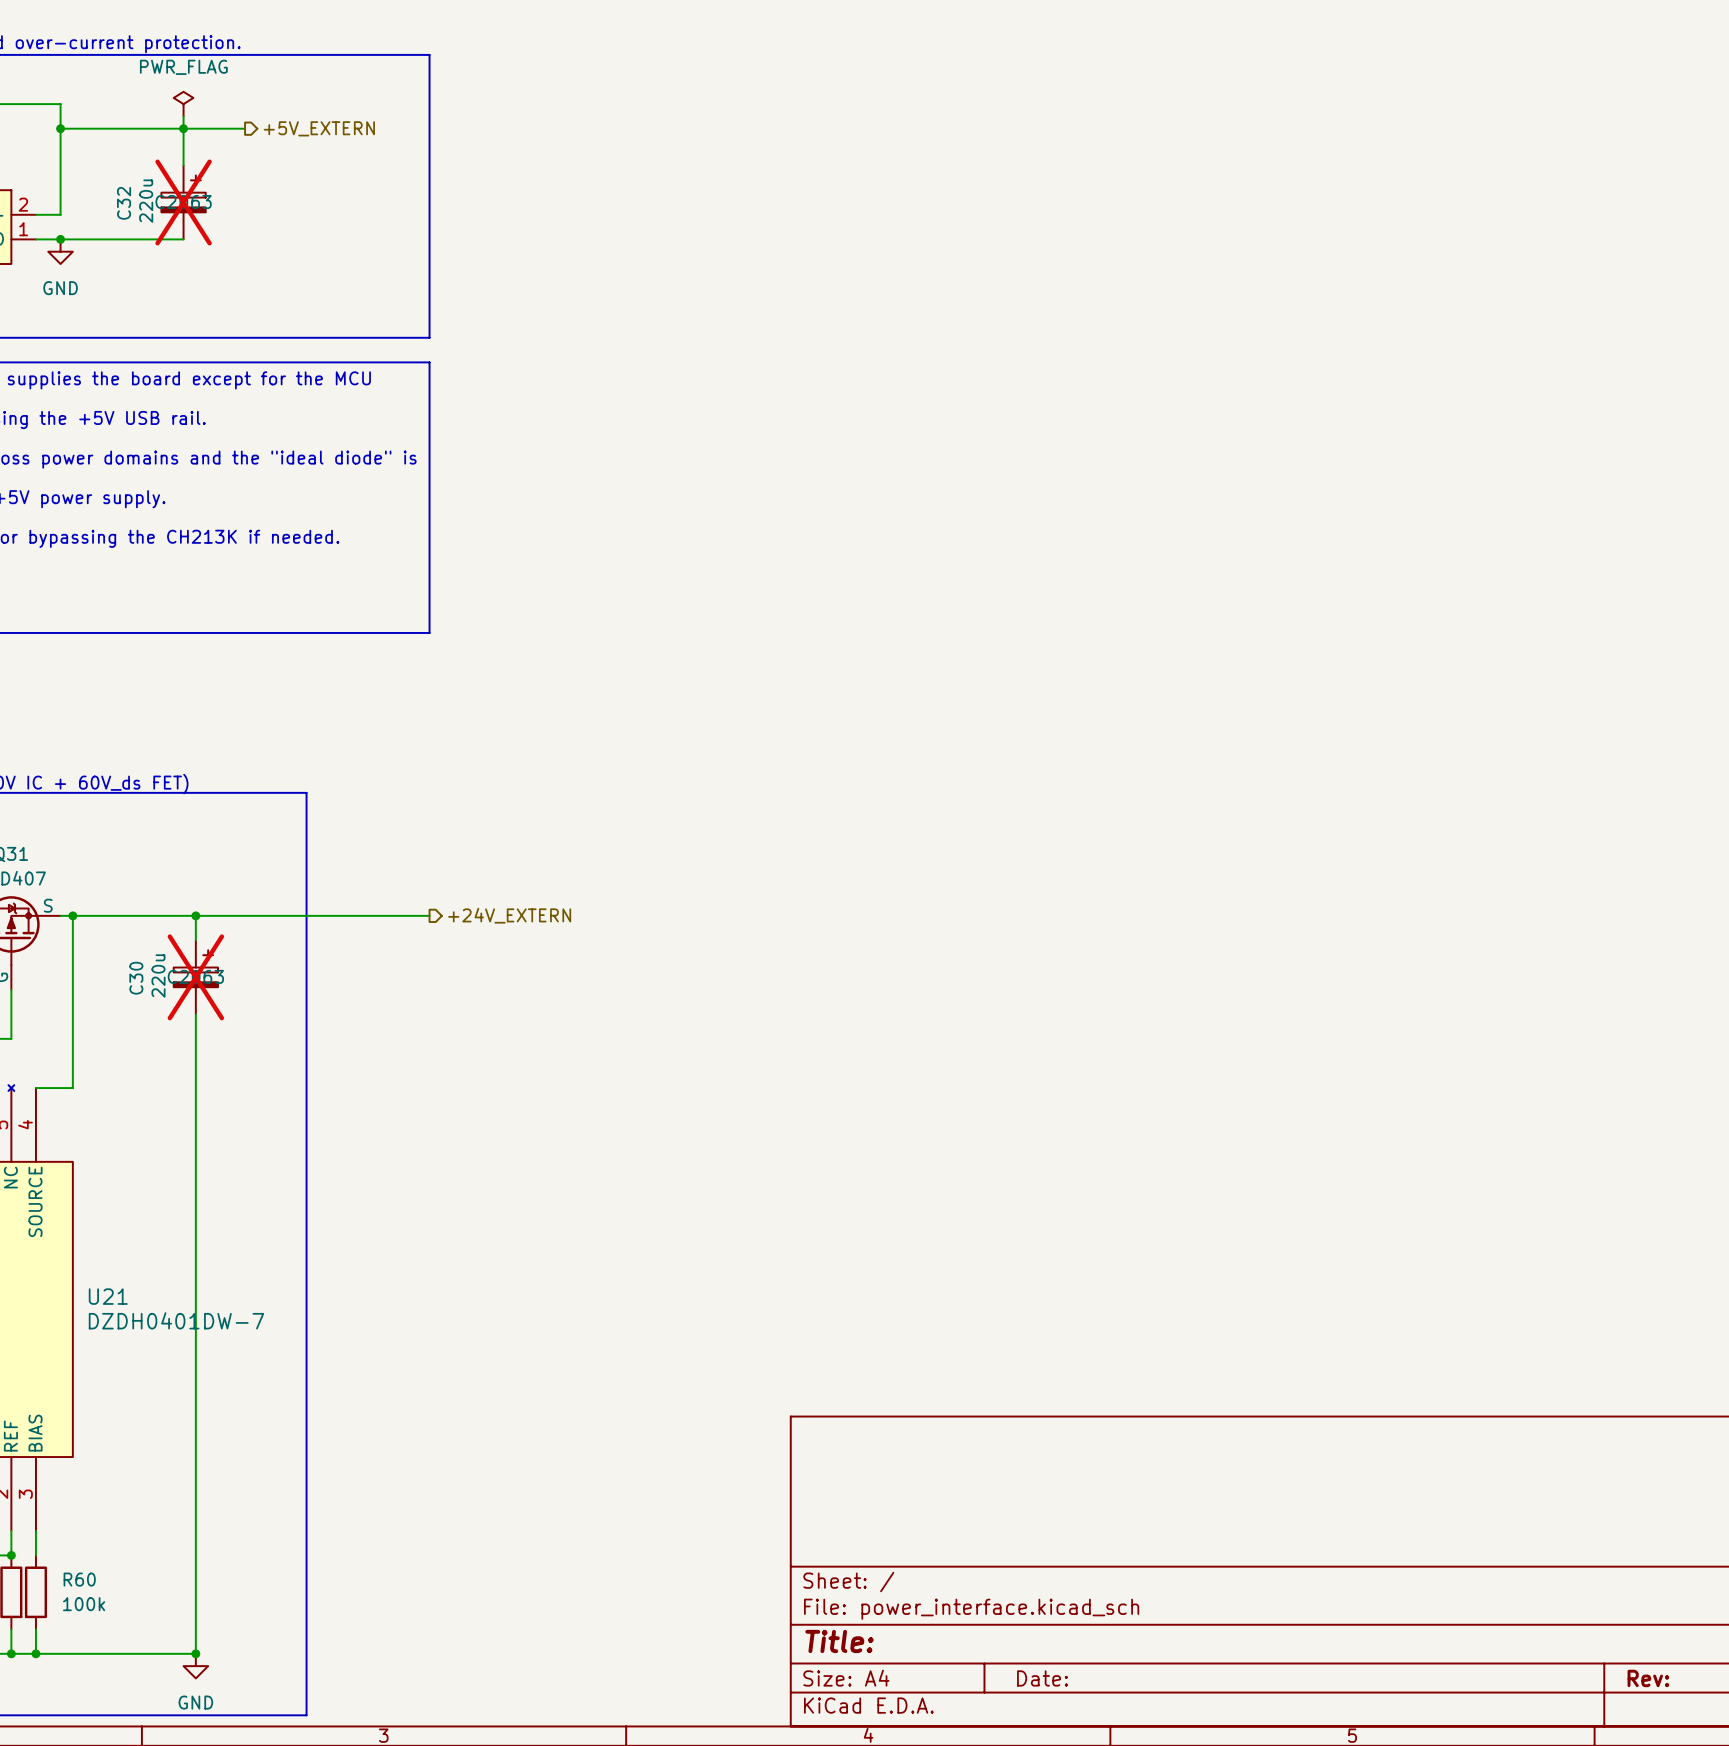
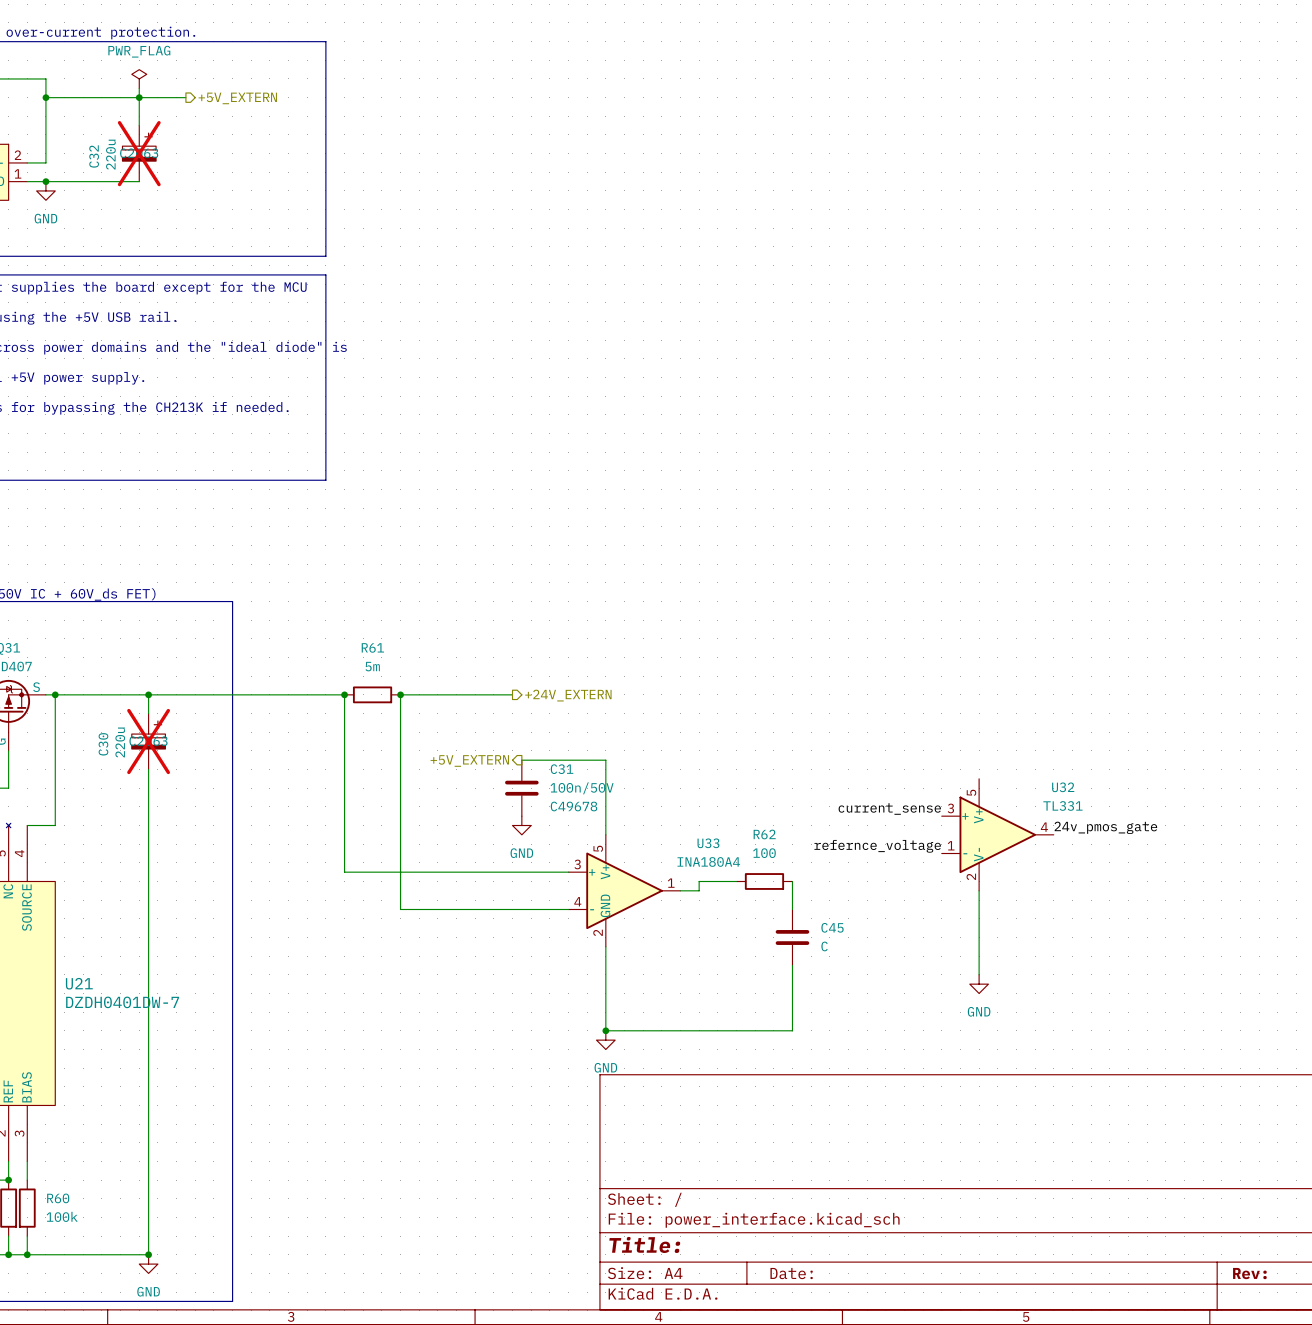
wire: none -> (325, 694) (344, 694) (344, 872) (568, 872)
junction: none -> (344, 694)
R61: none -> 5m (372, 694)
hierarchical label: +24V_EXTERN (509, 915) -> none
junction: none -> (400, 694)
wire: none -> (512, 694) (400, 694) (400, 909) (568, 909)
hierarchical label: none -> +24V_EXTERN (568, 695)
wire: none -> (521, 760) (605, 760) (605, 834)
hierarchical label: none -> +5V_EXTERN (469, 760)
C31: none -> 100n/50V (521, 788)
label: none -> current_sense (889, 808)
power symbol: none -> GND (521, 825)
label: none -> 24v_pmos_gate (1105, 827)
U32: none -> TL331 (997, 834)
label: none -> refernce_voltage (877, 846)
wire: none -> (736, 881) (699, 881) (699, 890) (680, 890)
R62: none -> 100 (764, 881)
wire: none -> (792, 881) (792, 909)
U33: none -> INA180A4 (624, 890)
wire: none -> (979, 890) (979, 974)
C45: none -> C (792, 937)
wire: none -> (605, 946) (605, 1030) (792, 1030) (792, 965)
power symbol: none -> GND (979, 984)
junction: none -> (605, 1030)
power symbol: none -> GND (605, 1040)

